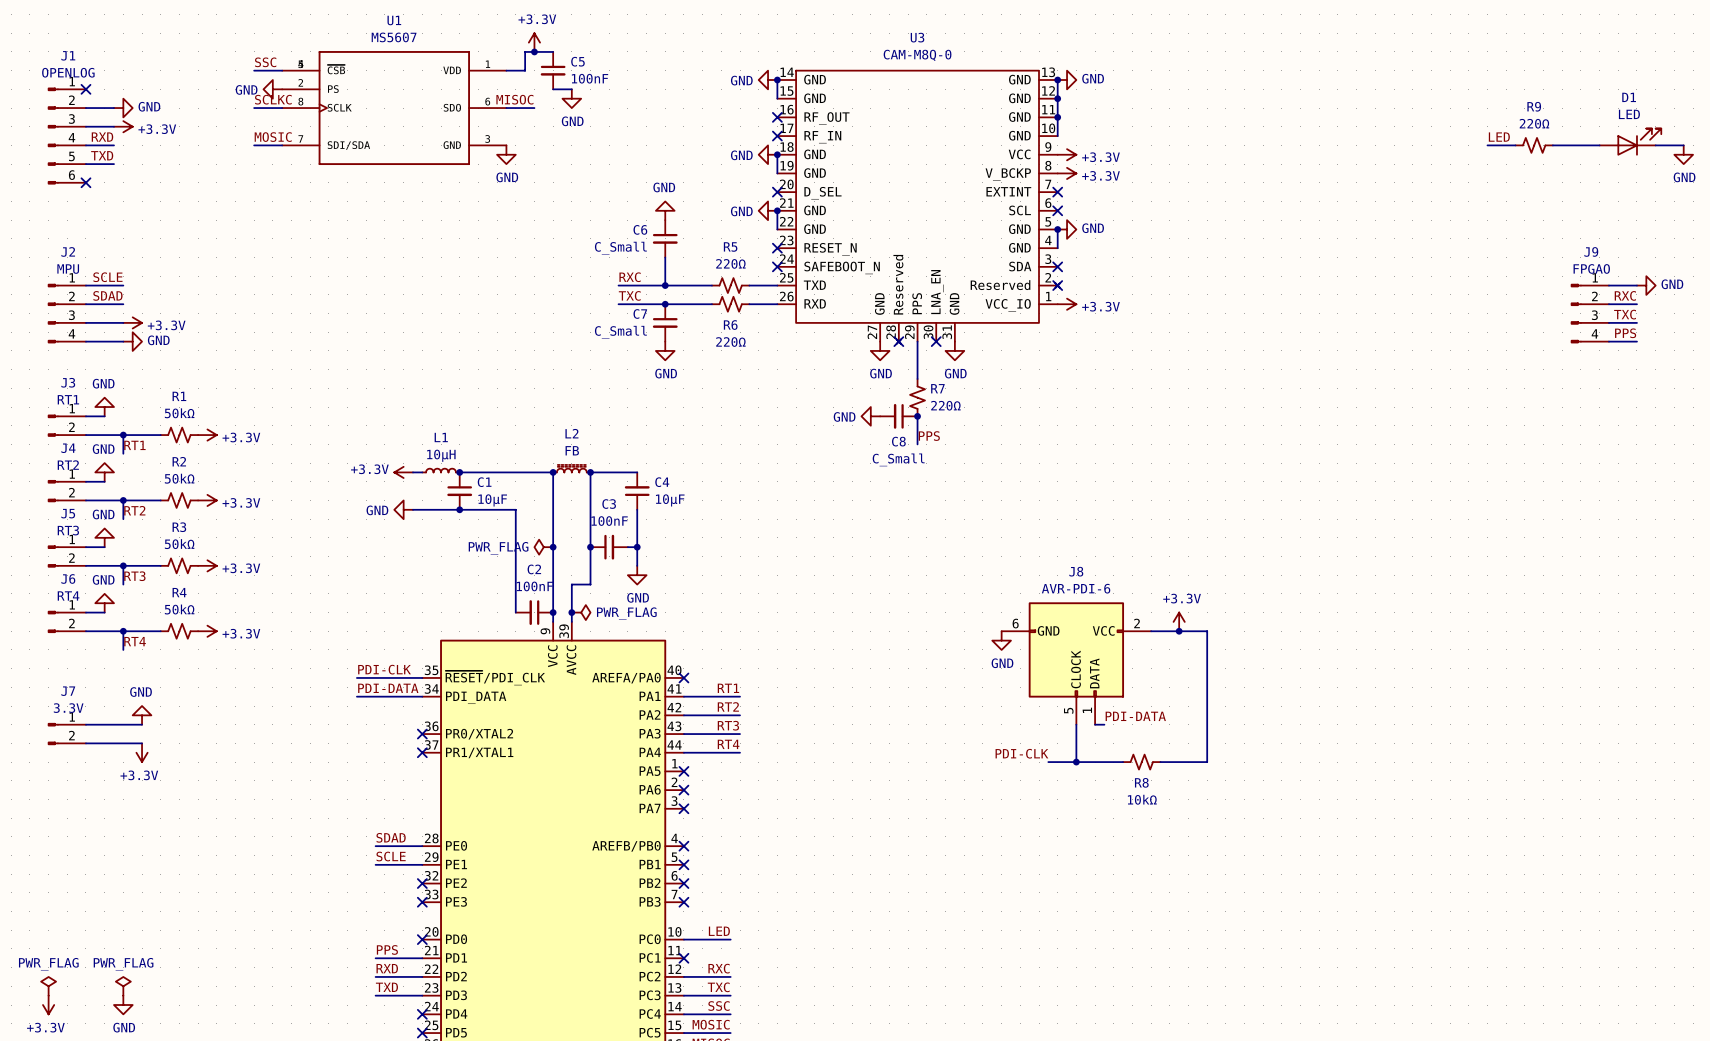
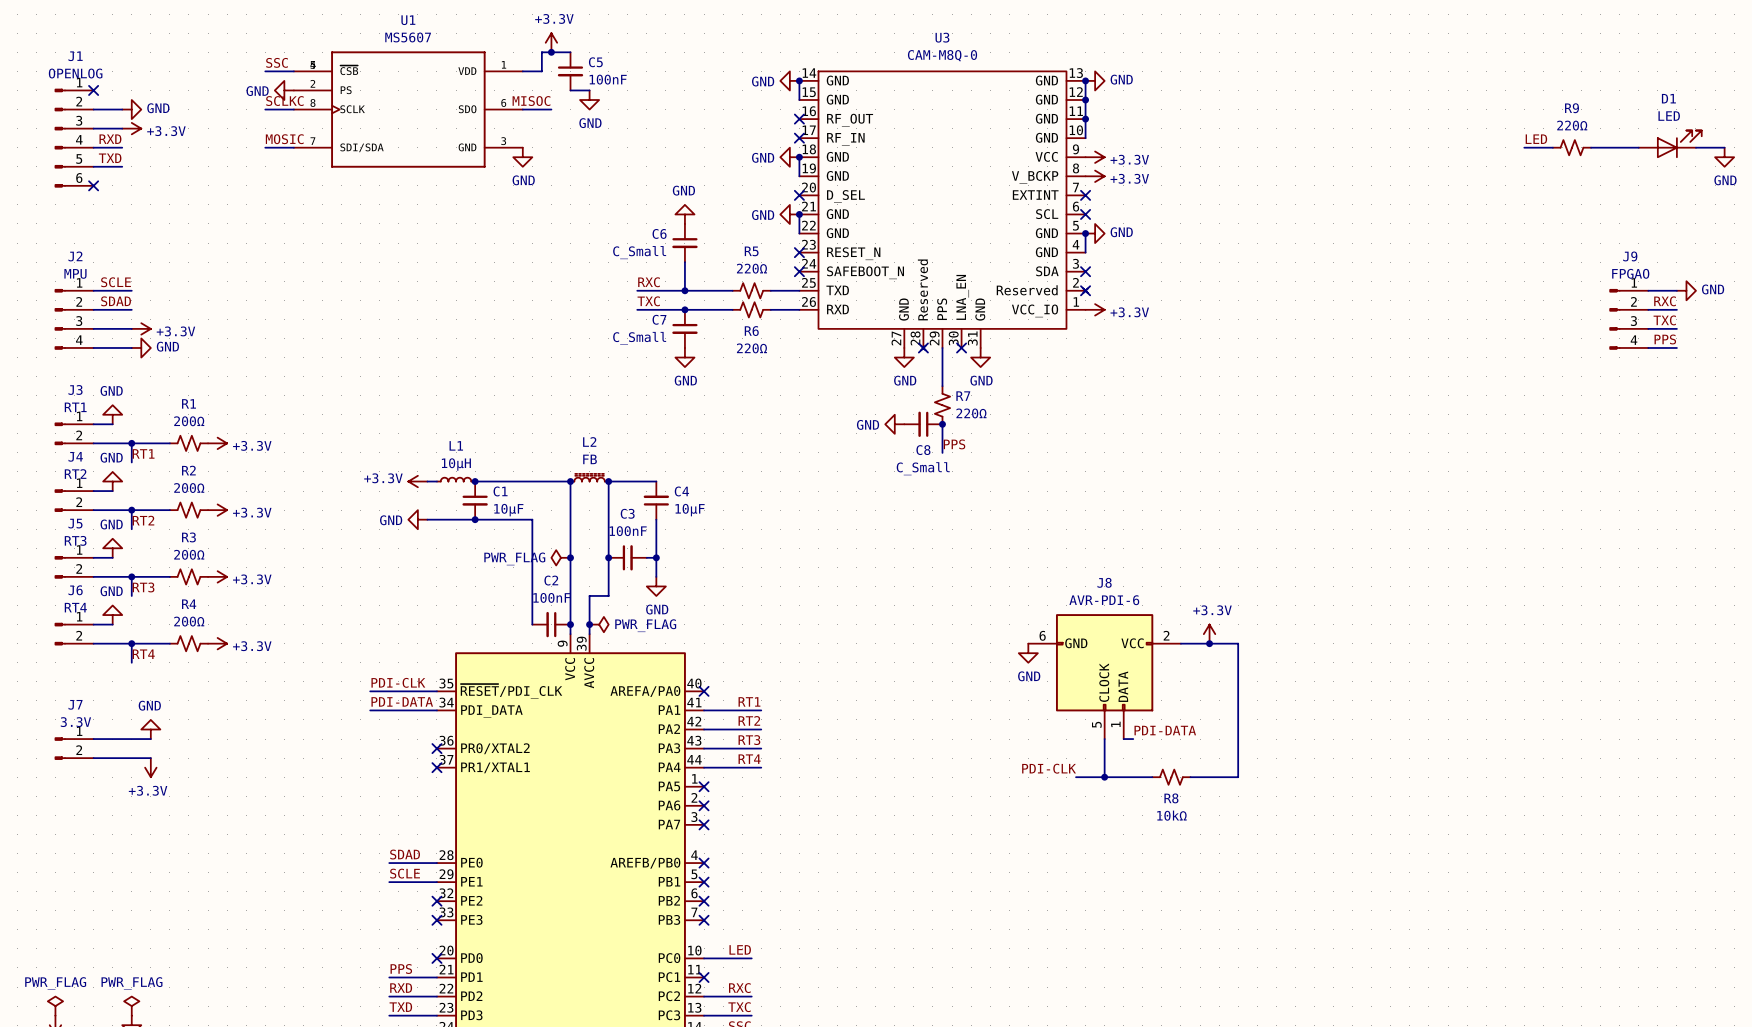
R1 value: 50kΩ (179, 413) -> 200Ω (189, 421)
R2 value: 50kΩ (179, 478) -> 200Ω (189, 488)
R3 value: 50kΩ (179, 544) -> 200Ω (189, 554)
R4 value: 50kΩ (179, 609) -> 200Ω (189, 621)

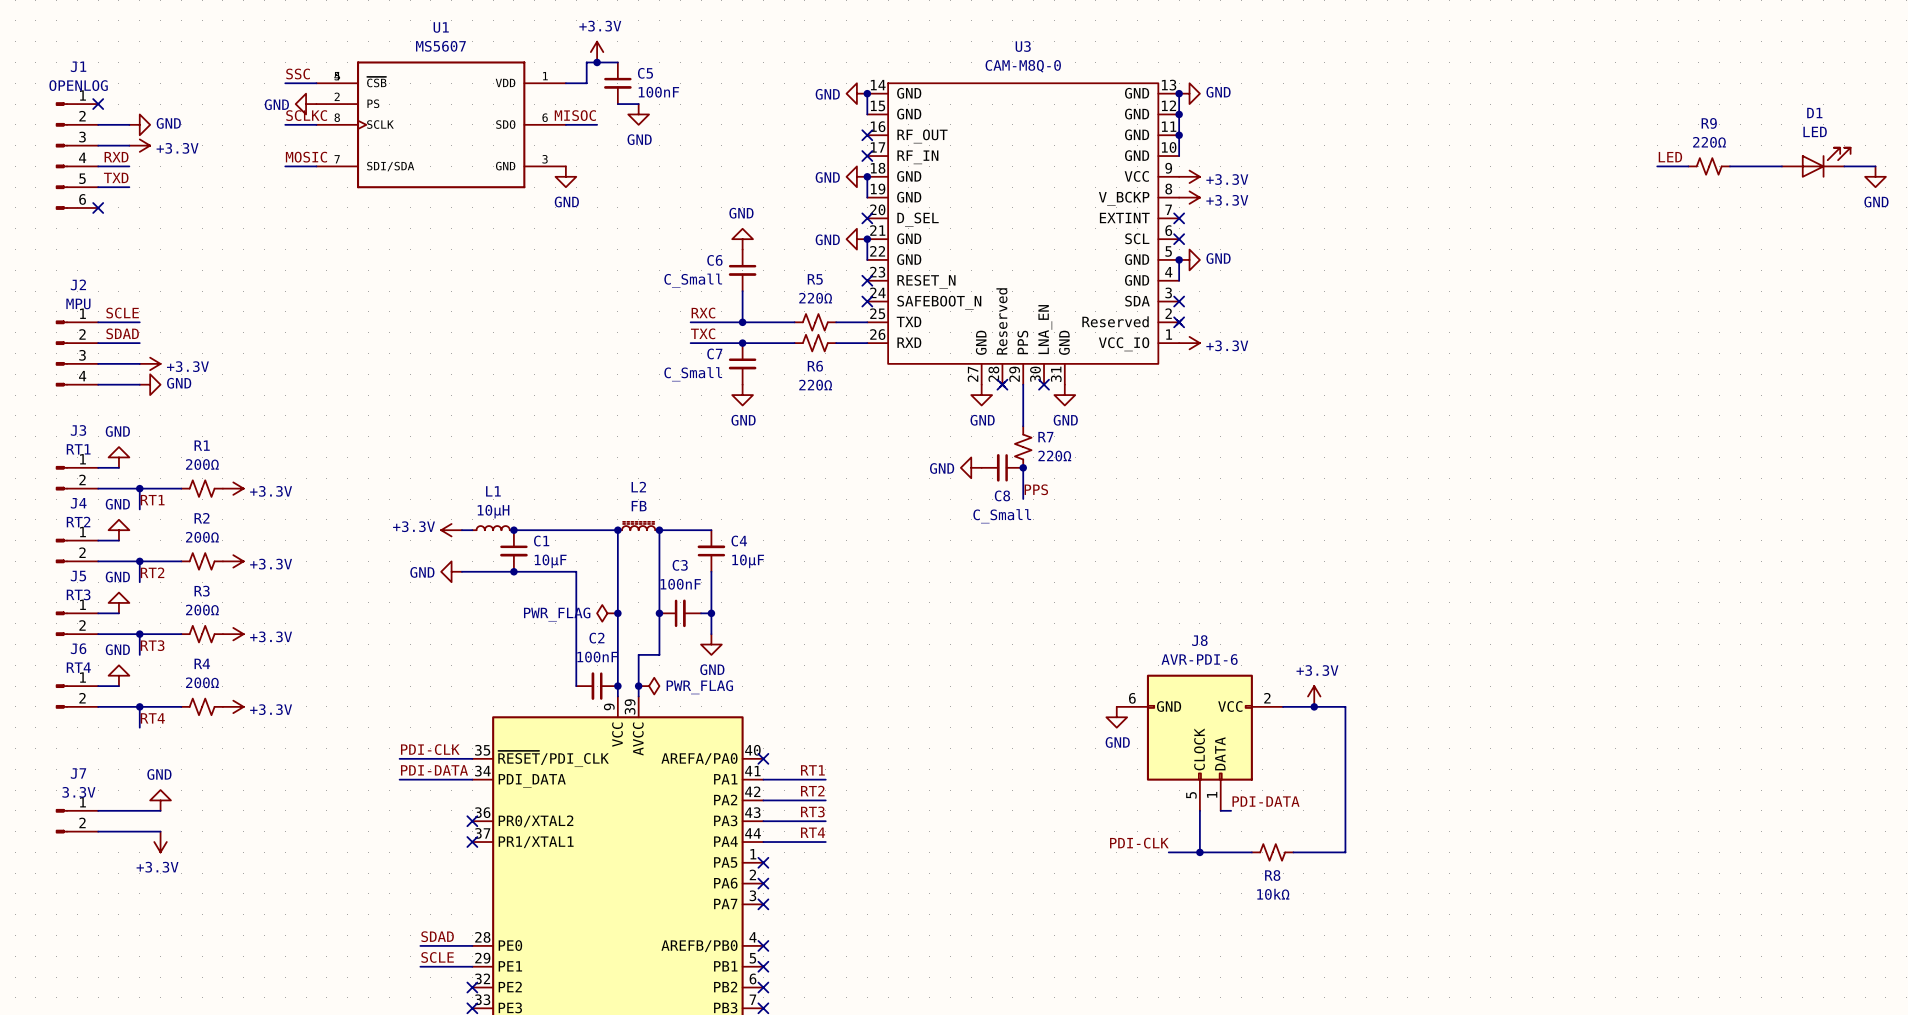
wire: (1648, 290) (1676, 290) -> none
power symbol: GND (1686, 290) -> none
label: RXC (1665, 301) -> none
wire: (1648, 309) (1676, 309) -> none
J9: FPGAO (1628, 319) -> none
label: TXC (1664, 320) -> none
wire: (1648, 328) (1676, 328) -> none
label: PPS (1665, 339) -> none
wire: (1648, 347) (1676, 347) -> none

